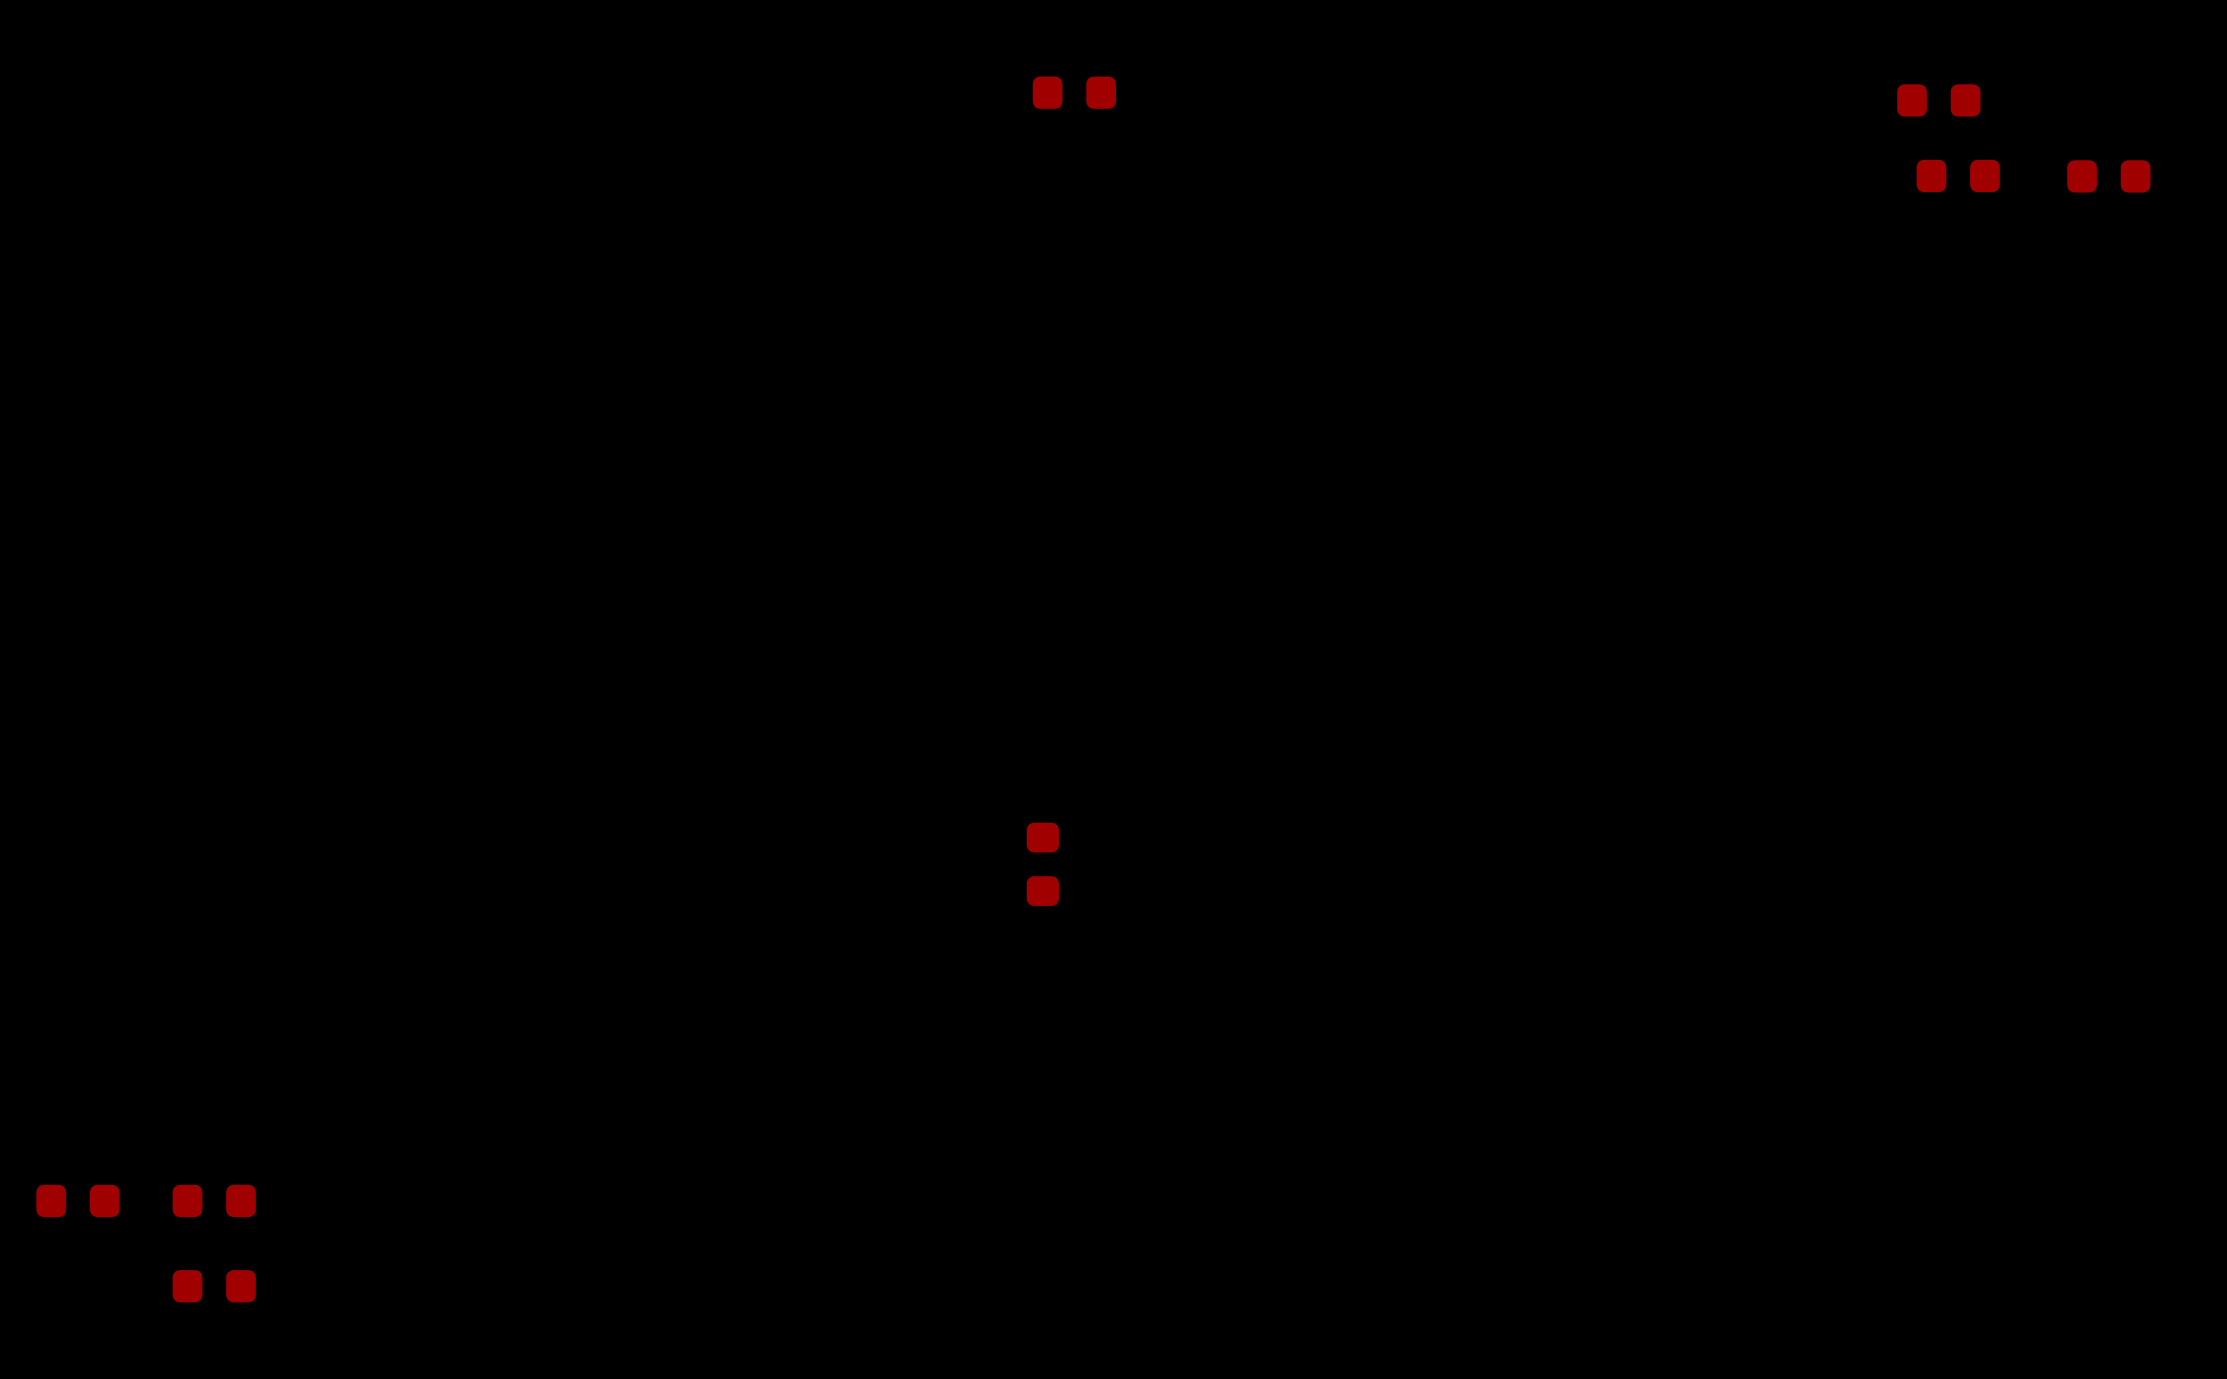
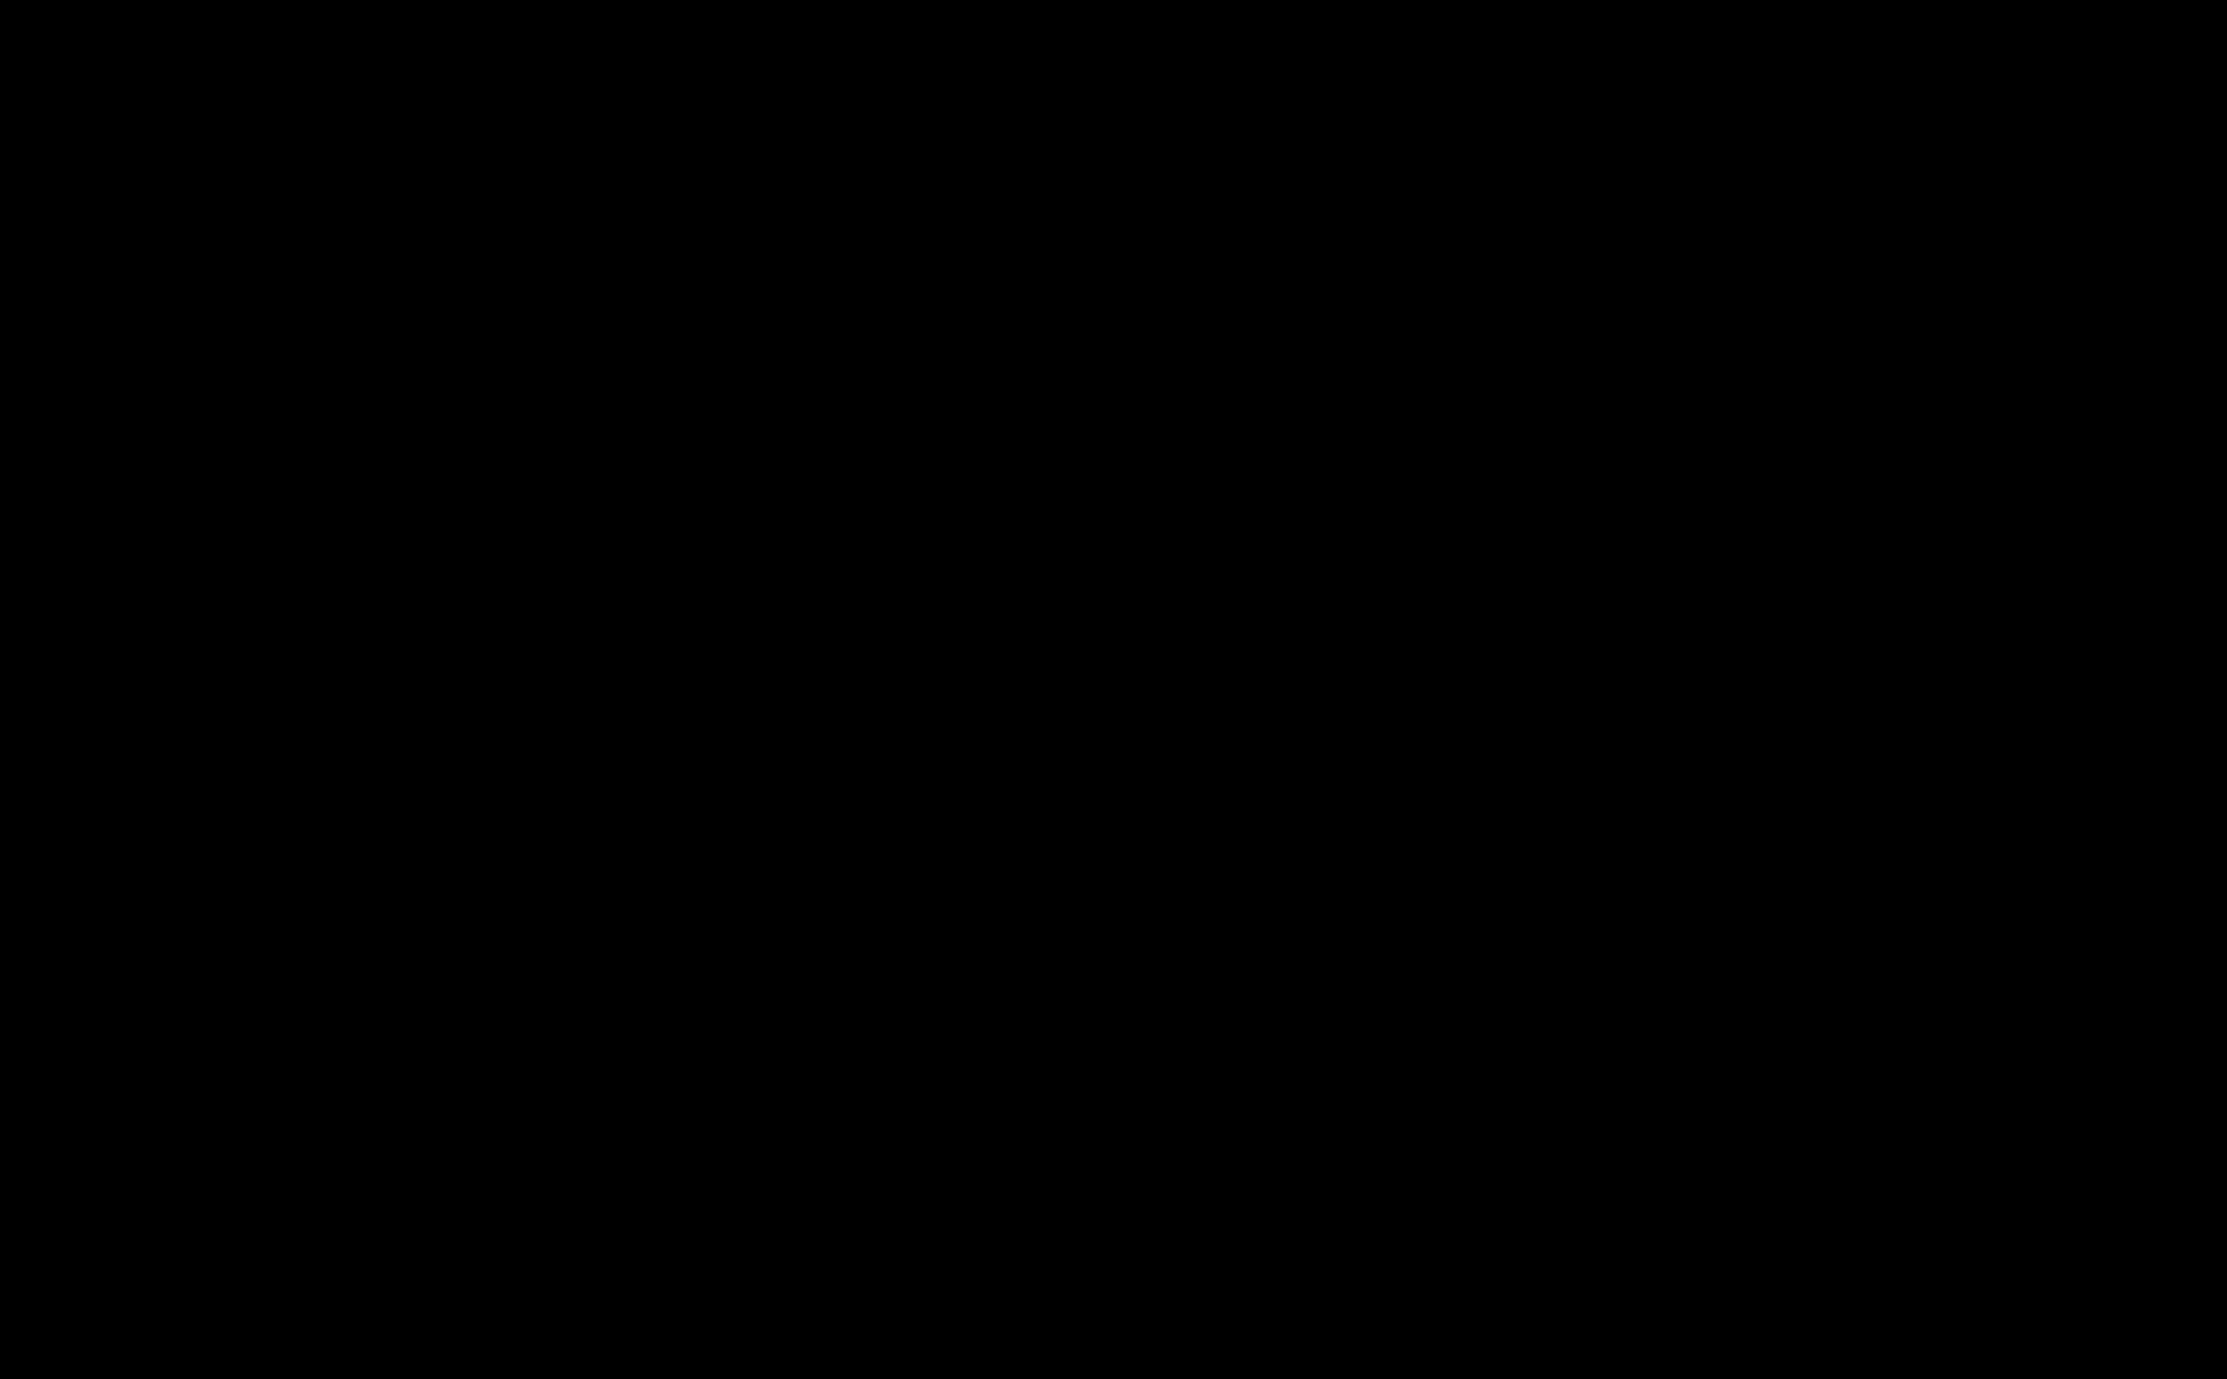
part: (1074, 92) -> none
part: (1938, 100) -> none
part: (1958, 175) -> none
part: (2108, 176) -> none
part: (1042, 864) -> none
part: (77, 1200) -> none
part: (214, 1200) -> none
part: (214, 1286) -> none

